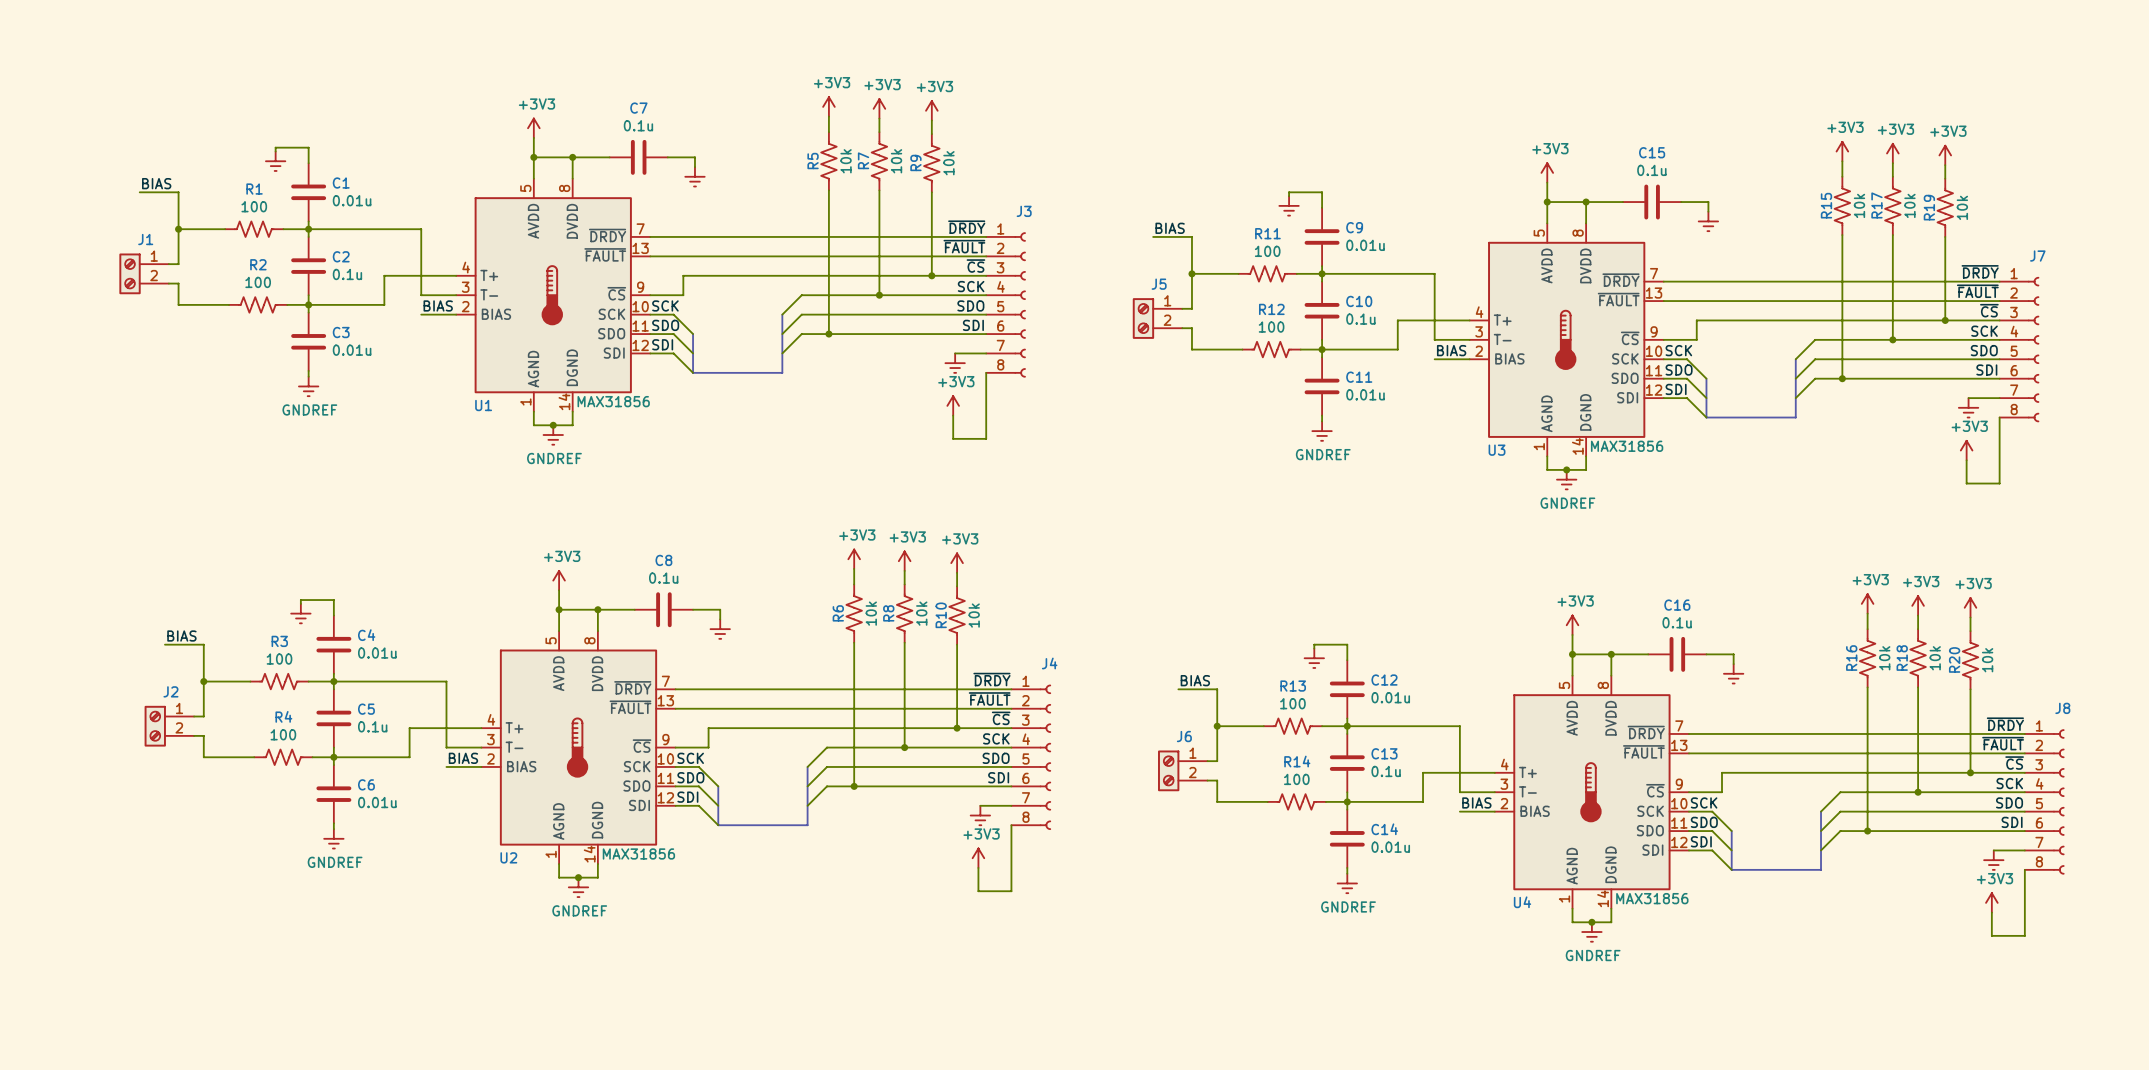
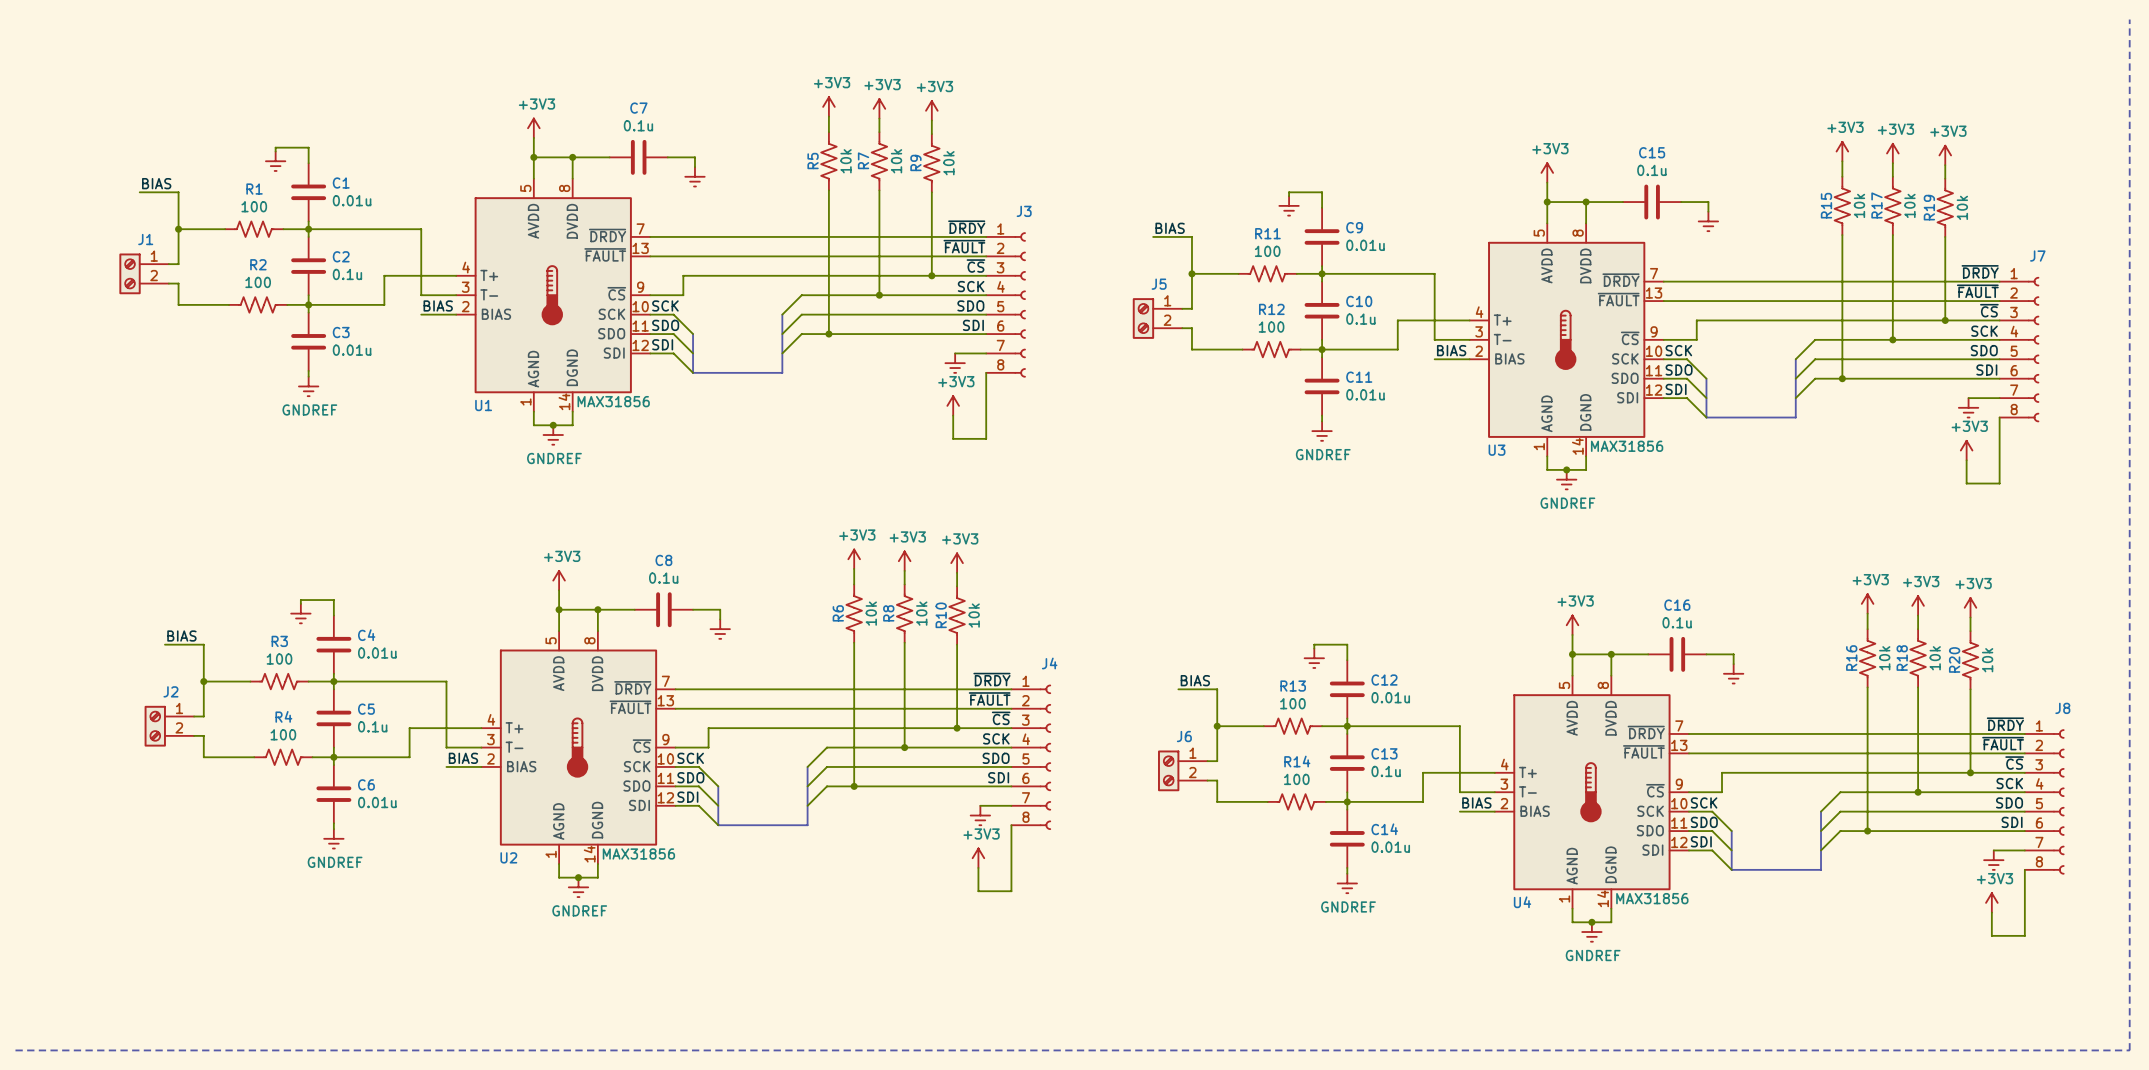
line: none -> (2129, 19) (2129, 1050) (15, 1050)

